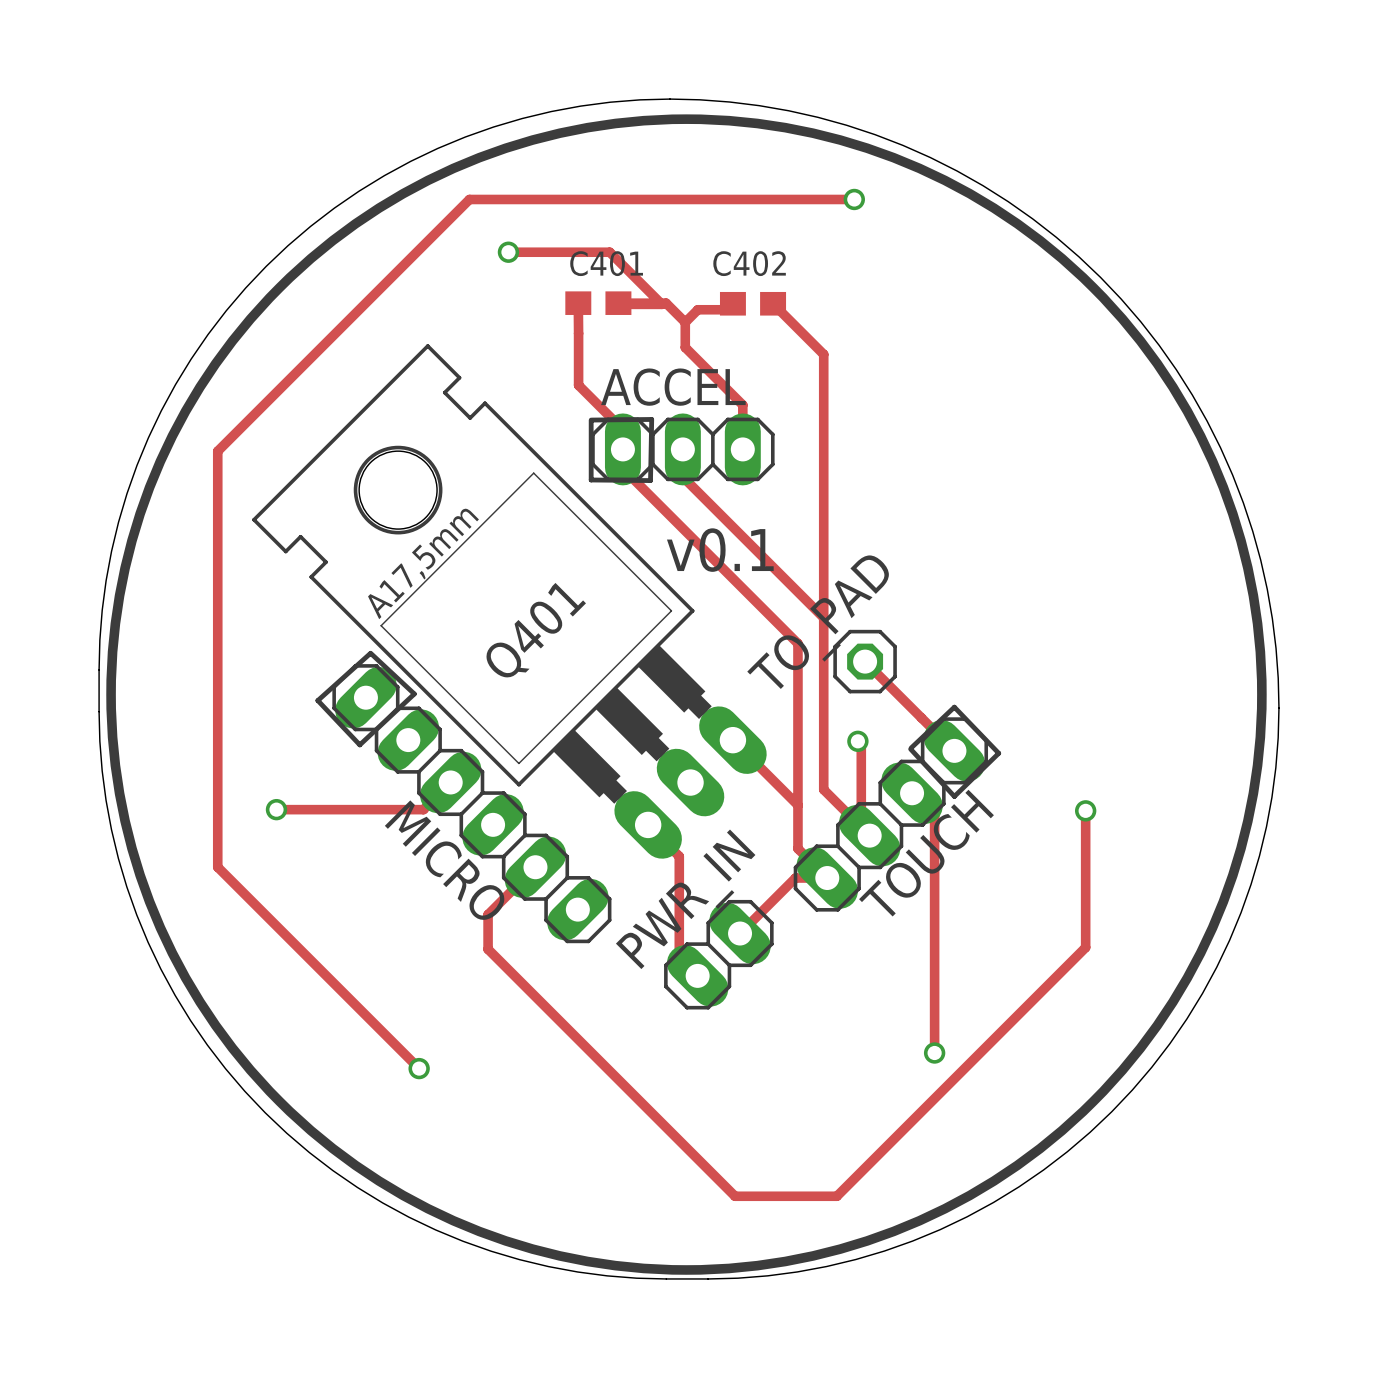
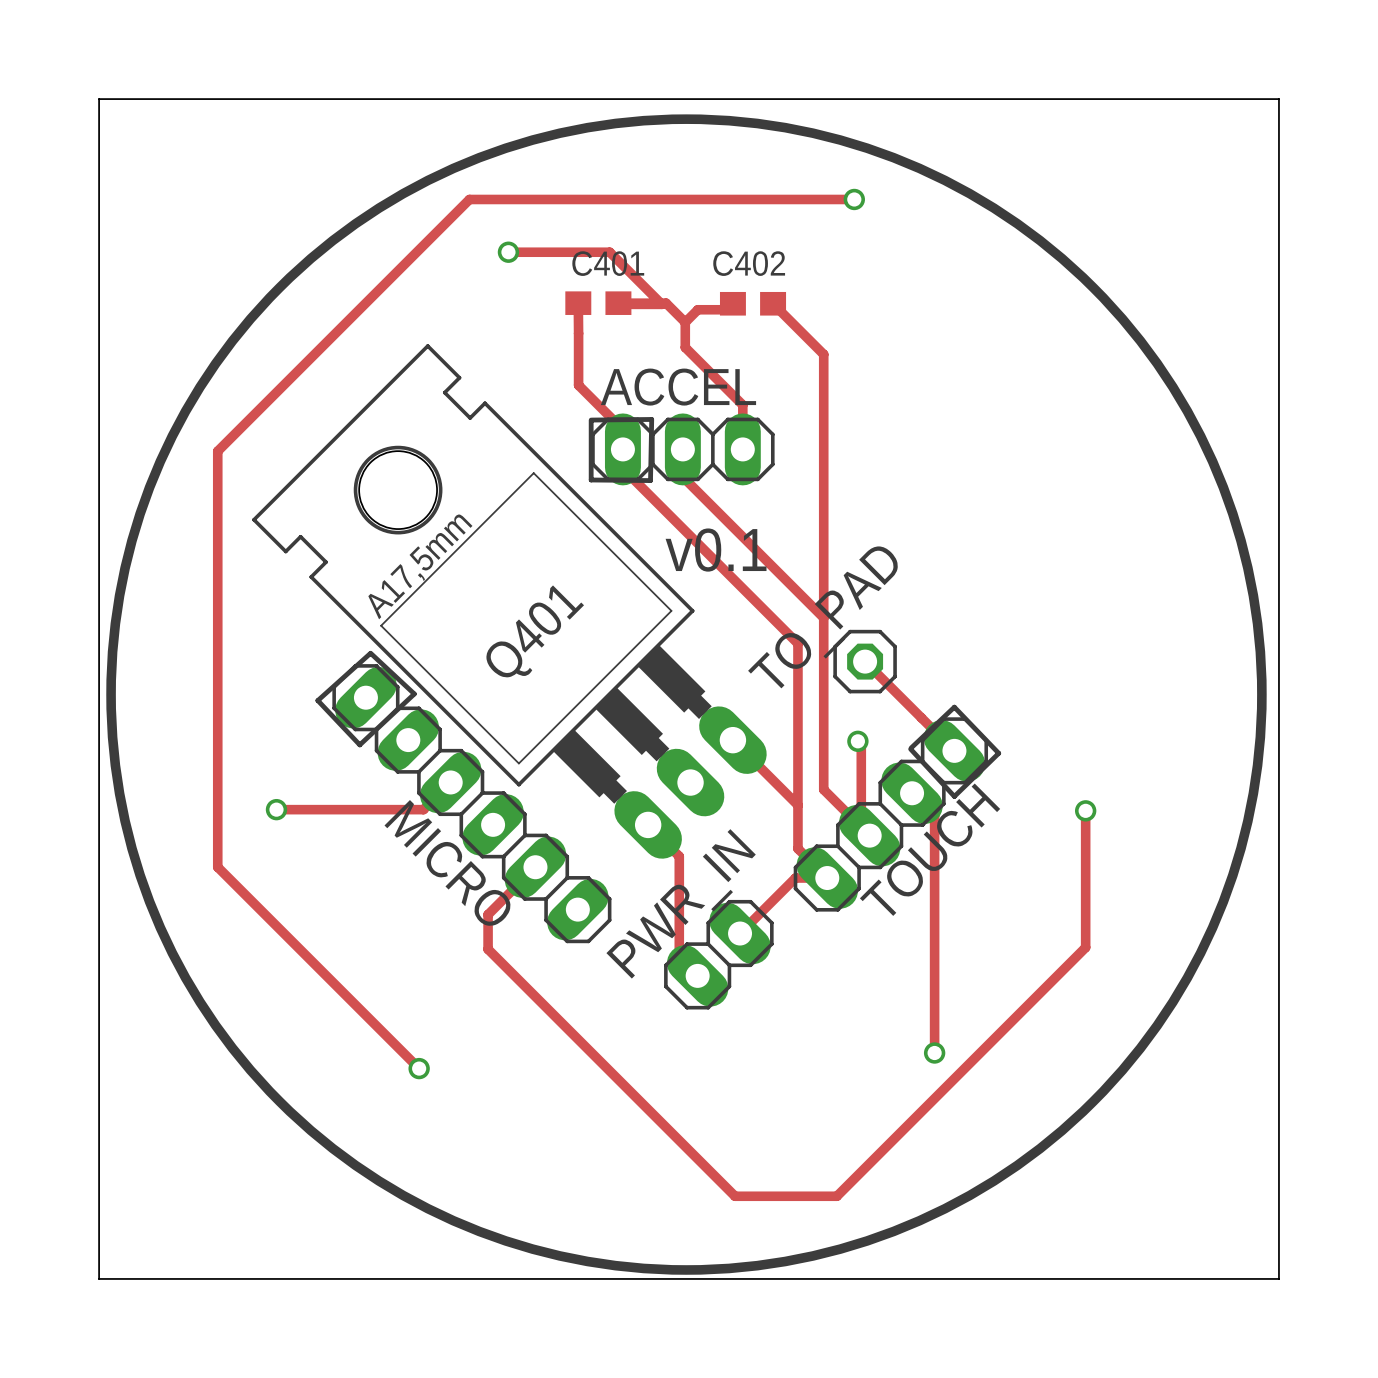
board edge: (99, 669) (102, 610) (106, 580) (111, 551) (127, 493) (148, 437) (161, 410) (191, 359) (226, 310) (245, 287) (287, 245) (310, 226) (359, 191) (384, 175) (437, 148) (465, 137) (493, 127) (551, 111) (610, 102) (640, 99) (699, 99) (788, 110) (875, 134) (957, 170) (1032, 218) (1100, 277) (1159, 345) (1207, 420) (1243, 502) (1267, 589) (1278, 678) (1278, 737) (1275, 767) (1266, 826) (1251, 884) (1241, 912) (1229, 940) (1202, 993) (1186, 1019) (1151, 1067) (1132, 1090) (1090, 1132) (1067, 1151) (1019, 1186) (967, 1216) (940, 1229) (884, 1251) (826, 1266) (797, 1271) (767, 1275) (708, 1278) -> (99, 669) (99, 99) (1278, 99) (1278, 1278) (708, 1278)
board edge: (99, 711) (99, 741) (106, 800) (118, 858) (136, 914) (160, 969) (190, 1020) (225, 1068) (265, 1112) (309, 1152) (357, 1187) (408, 1217) (463, 1241) (519, 1259) (577, 1271) (636, 1278) (666, 1278) -> (99, 711) (99, 1278) (666, 1278)

